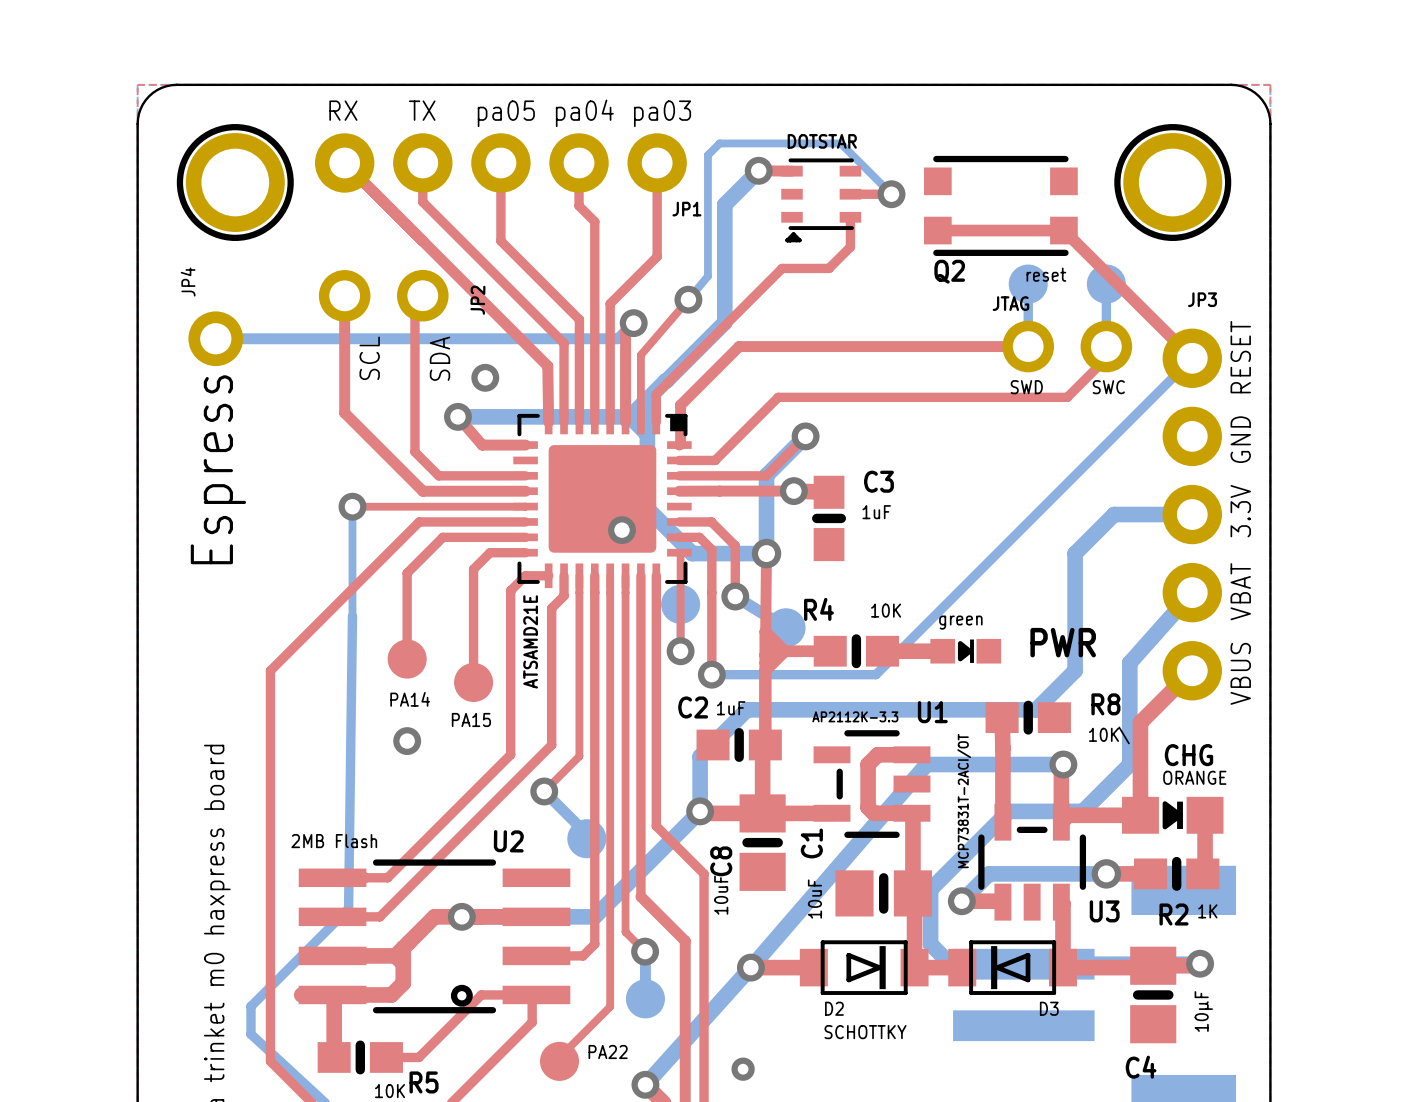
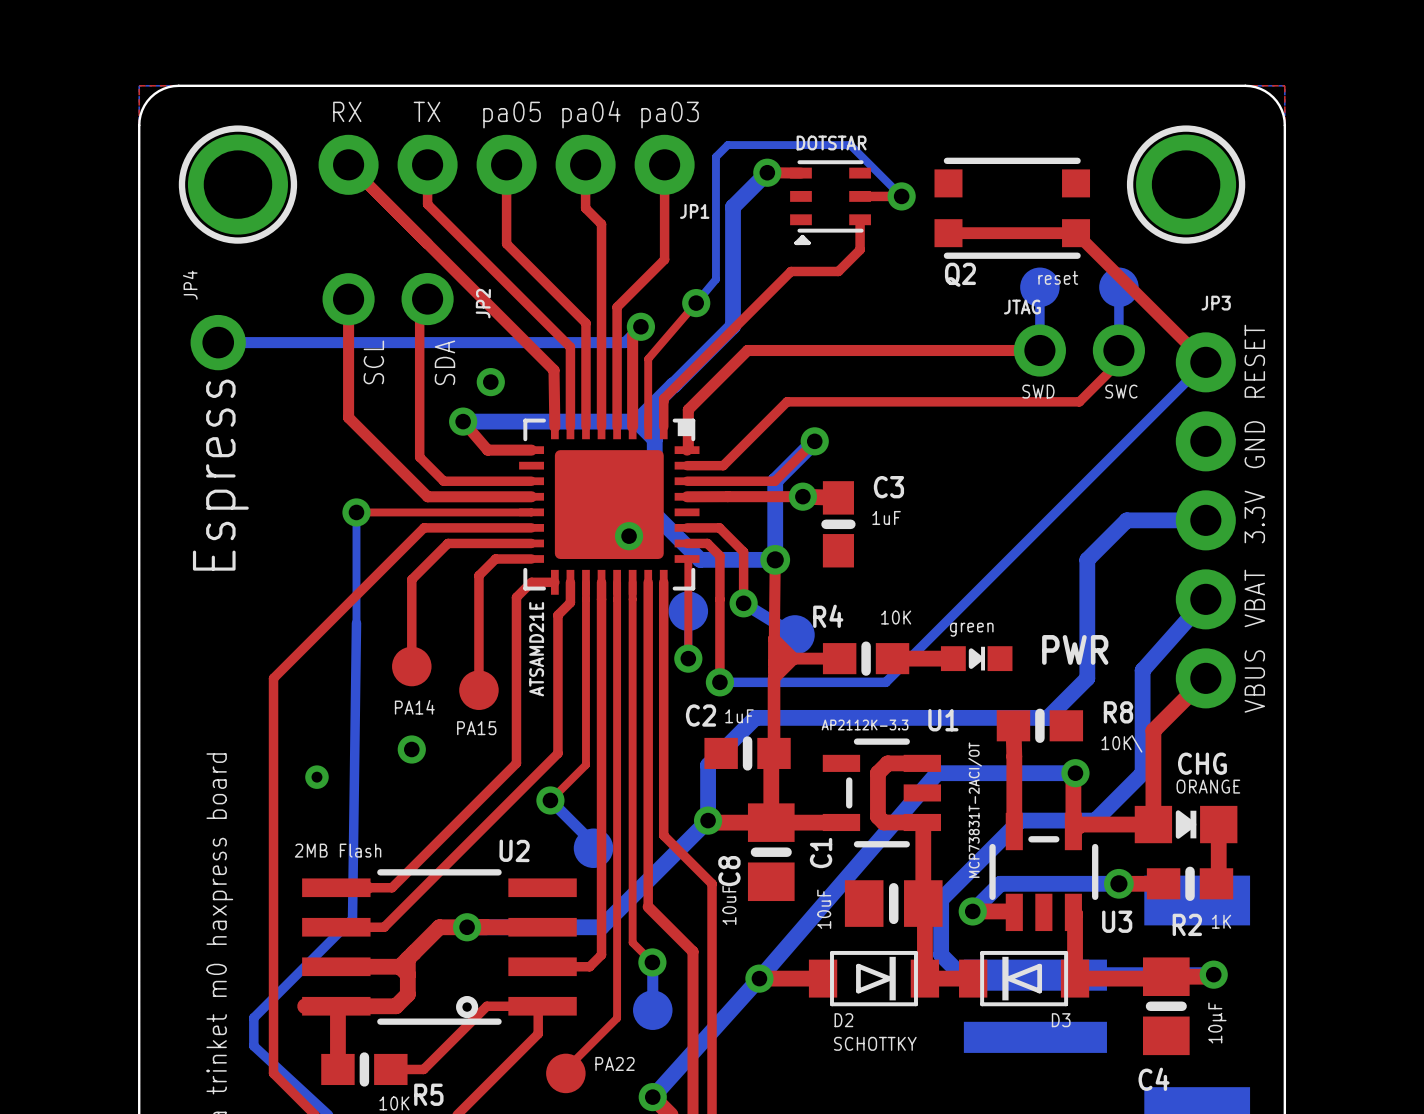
via: none -> (316, 777)
via: (743, 1069) -> none

